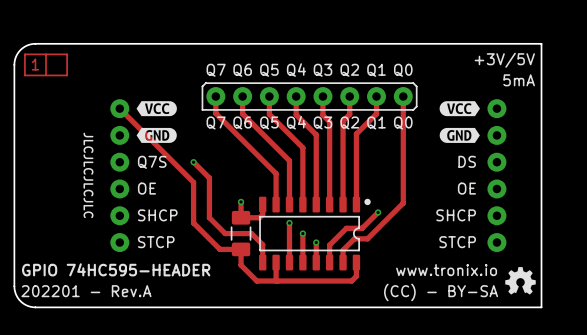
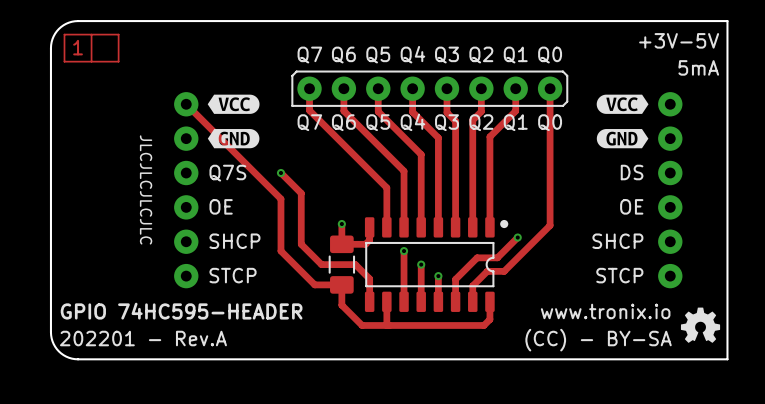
text: +3V/5V (504, 60) -> +3V-5V (679, 40)

